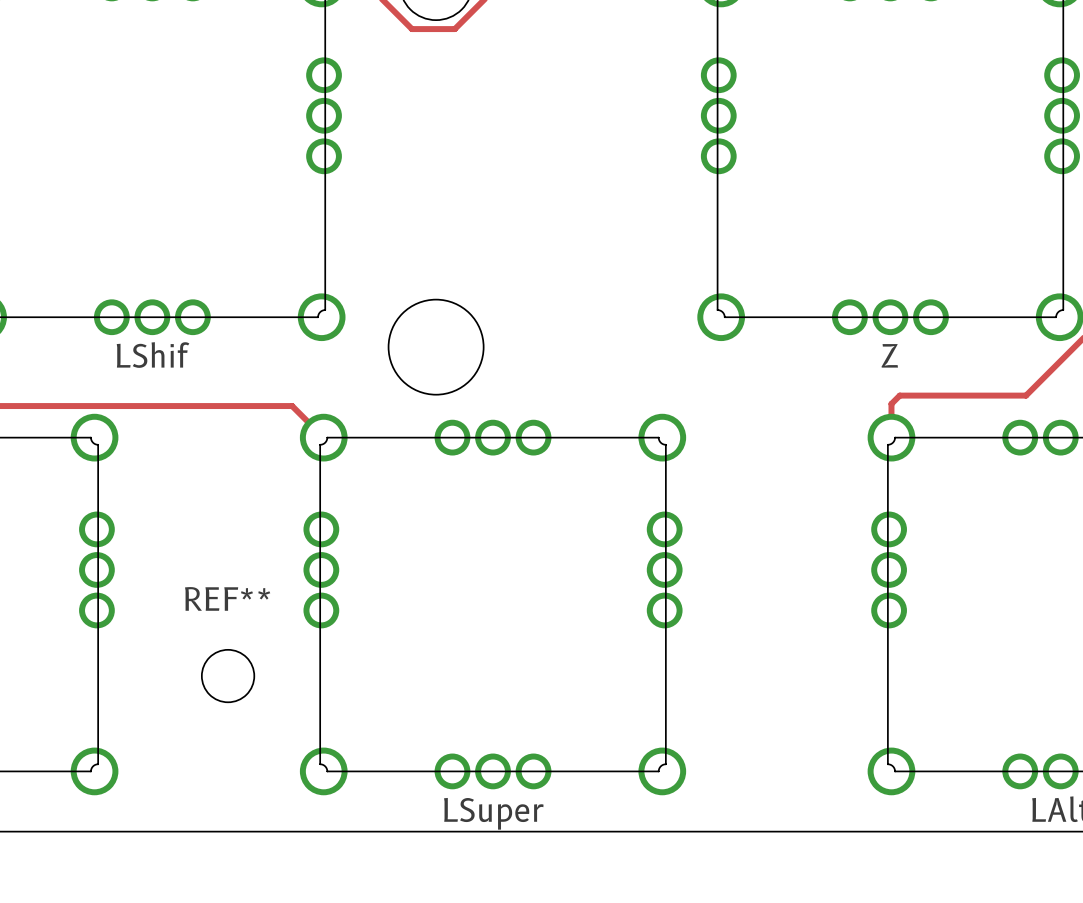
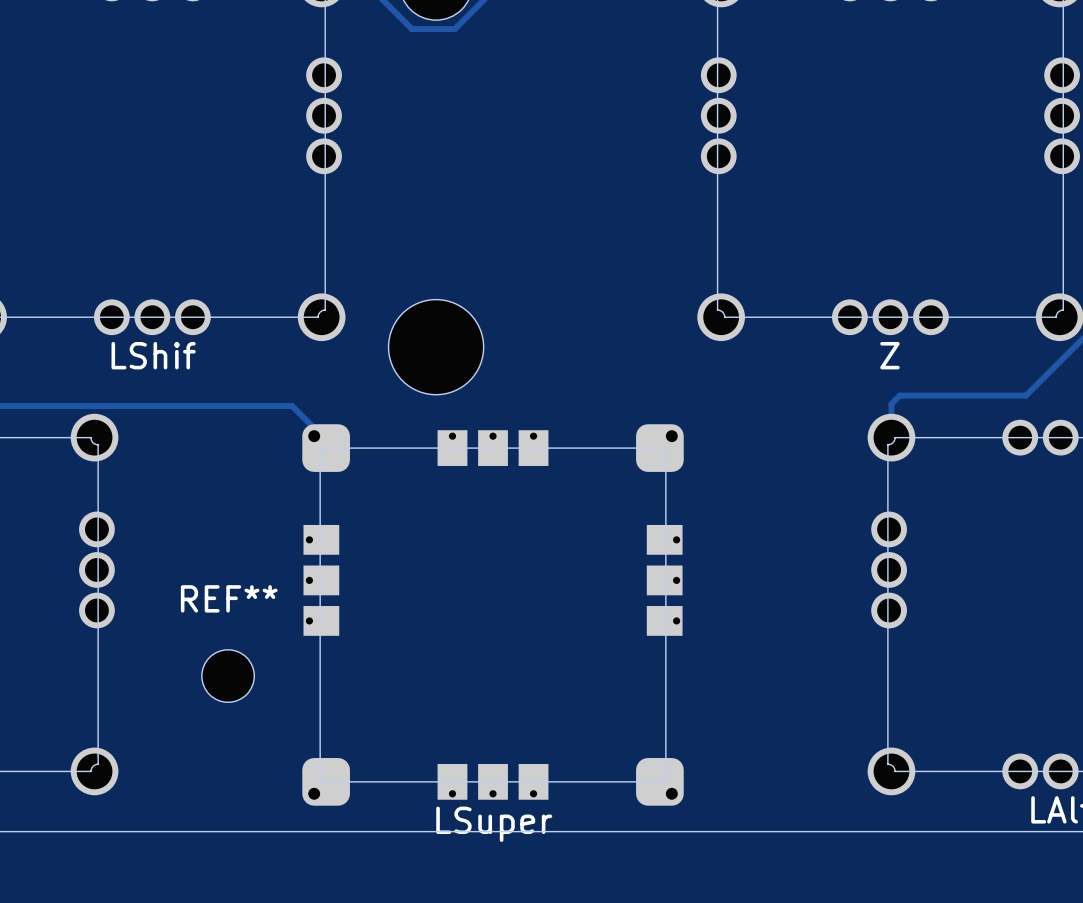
part footprint: [299, 413, 687, 796] -> [302, 424, 684, 806]

